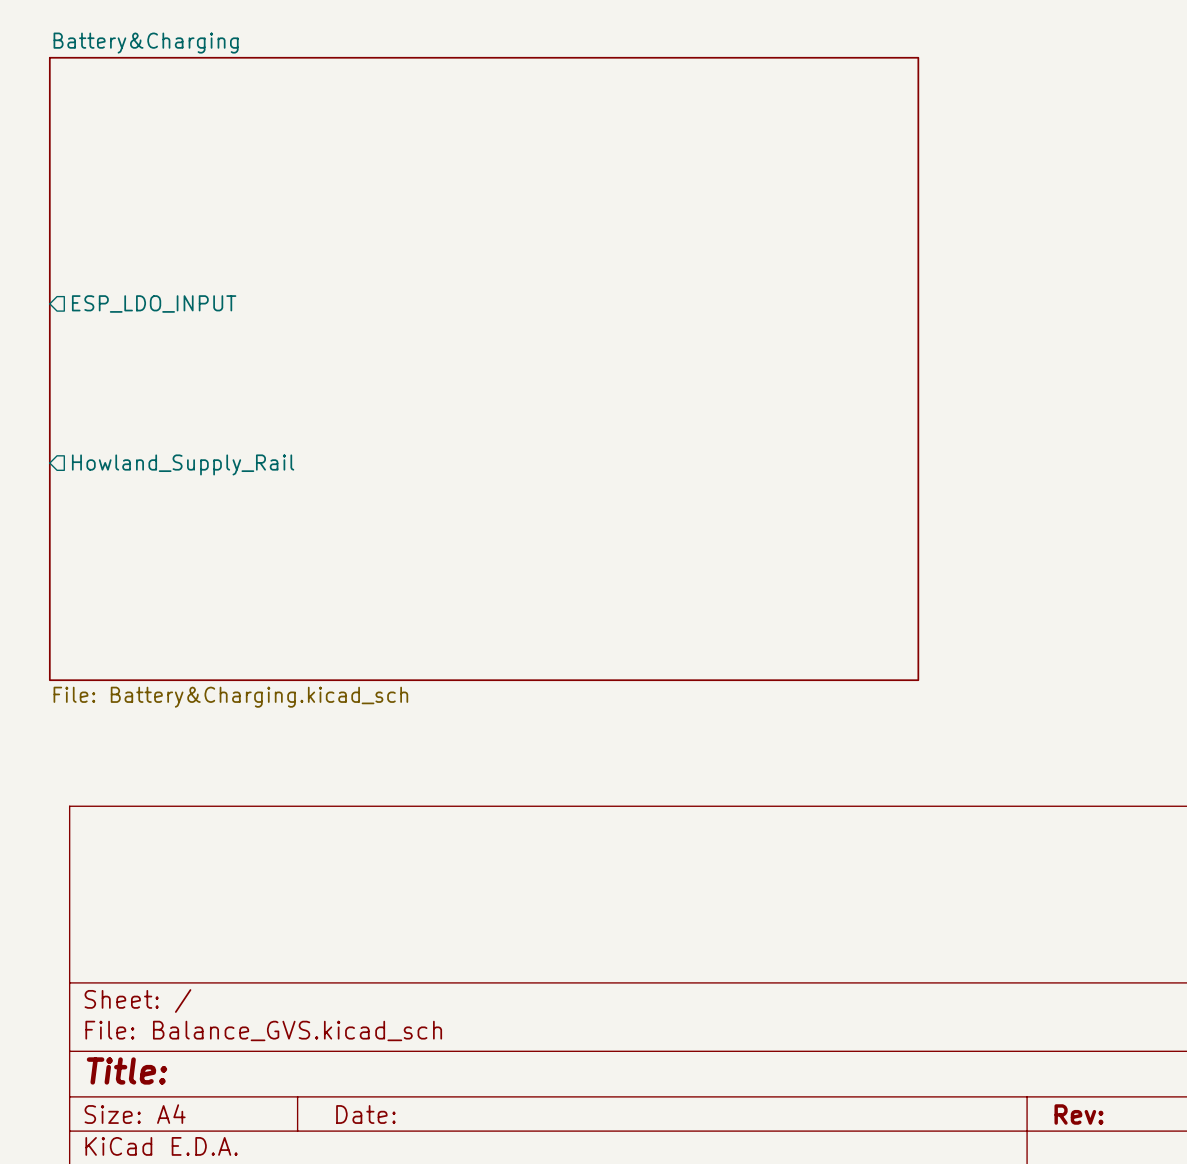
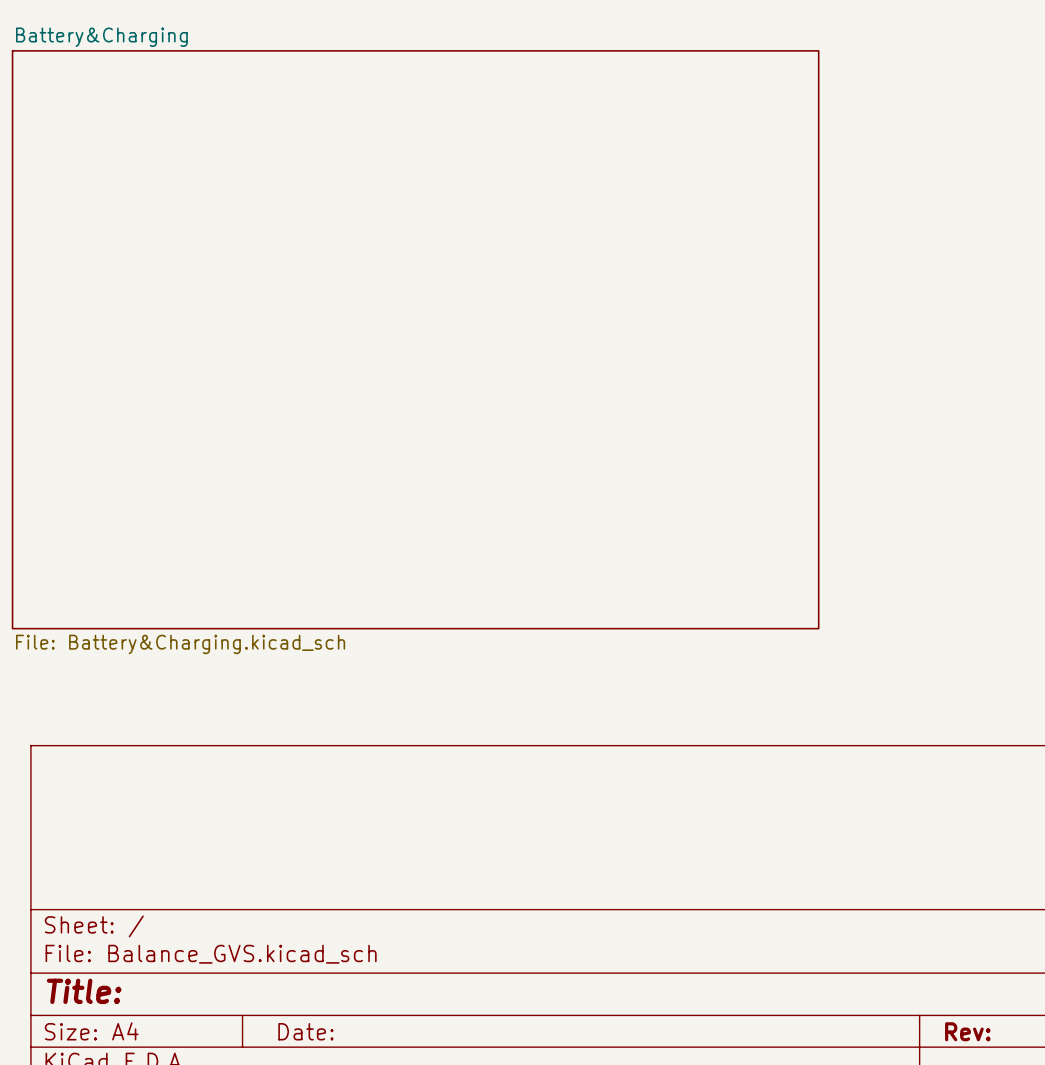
sheet pin: ESP_LDO_INPUT (154, 303) -> none
sheet pin: Howland_Supply_Rail (183, 464) -> none

